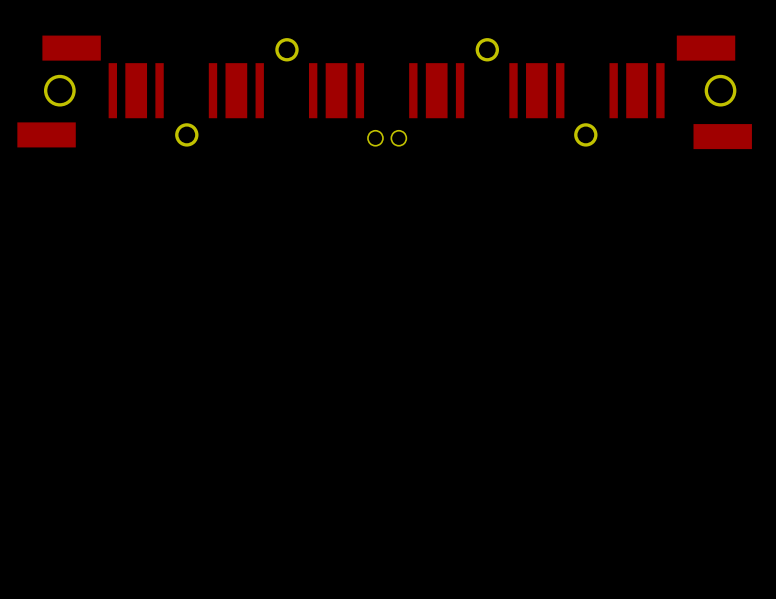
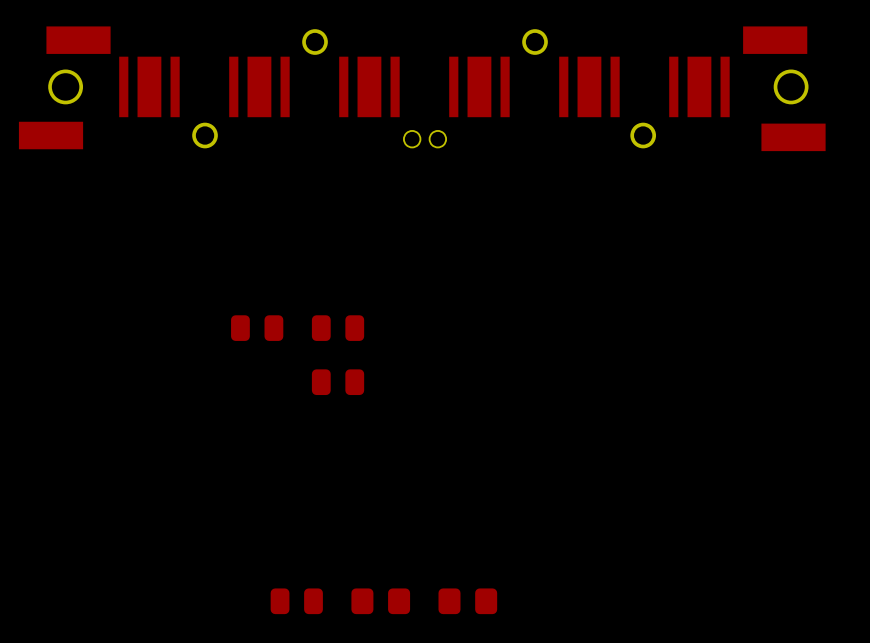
part: none -> (257, 328)
part: none -> (338, 328)
part: none -> (338, 382)
part: none -> (296, 601)
part: none -> (380, 601)
part: none -> (467, 601)

